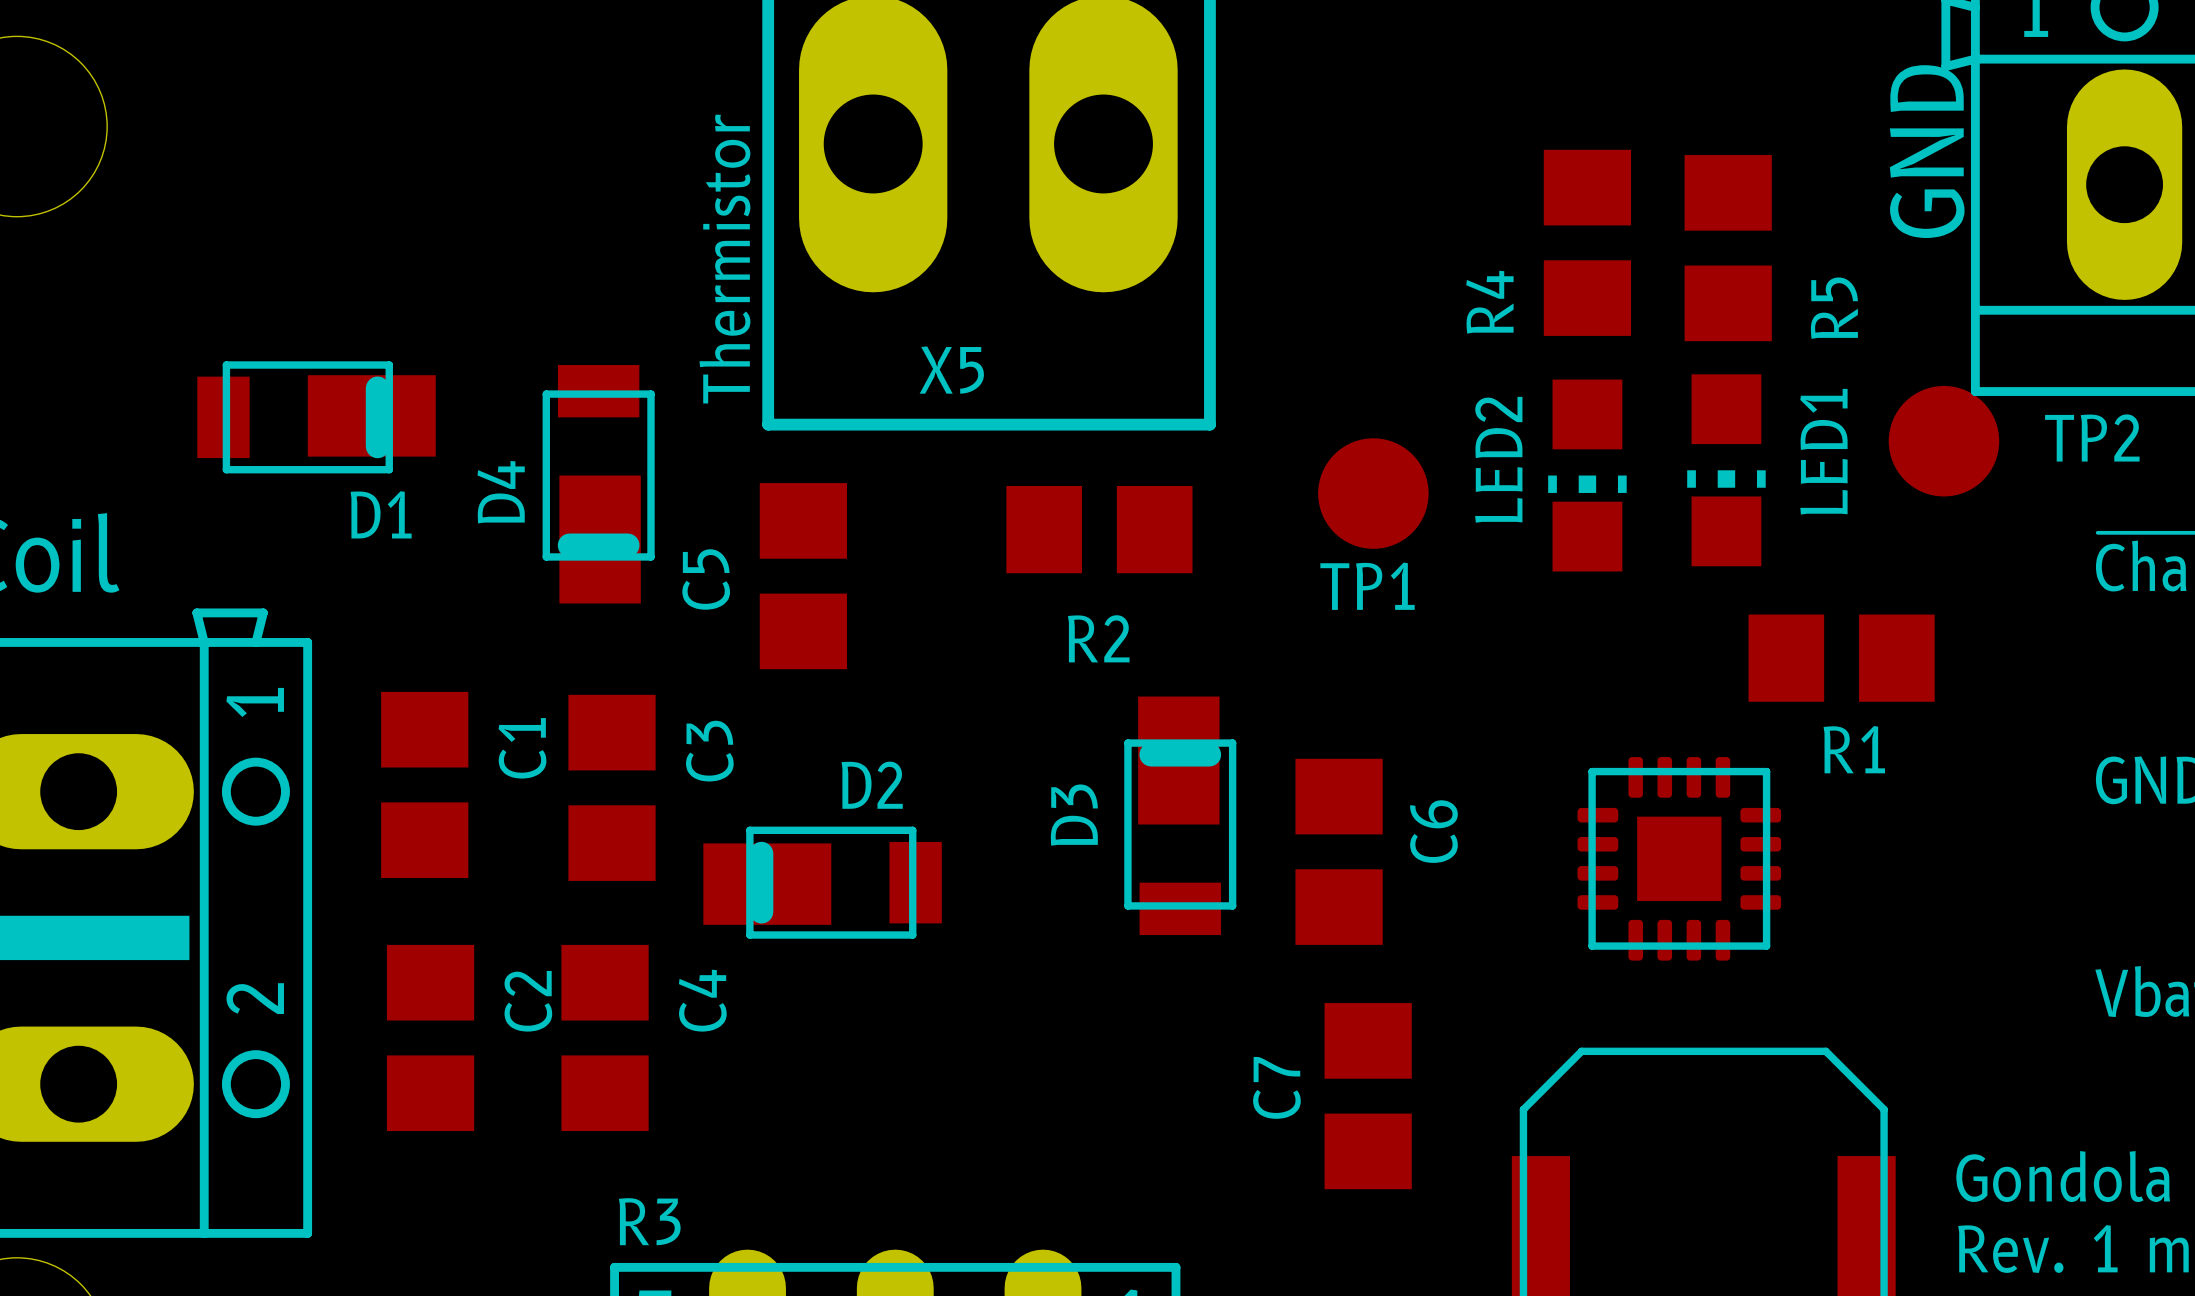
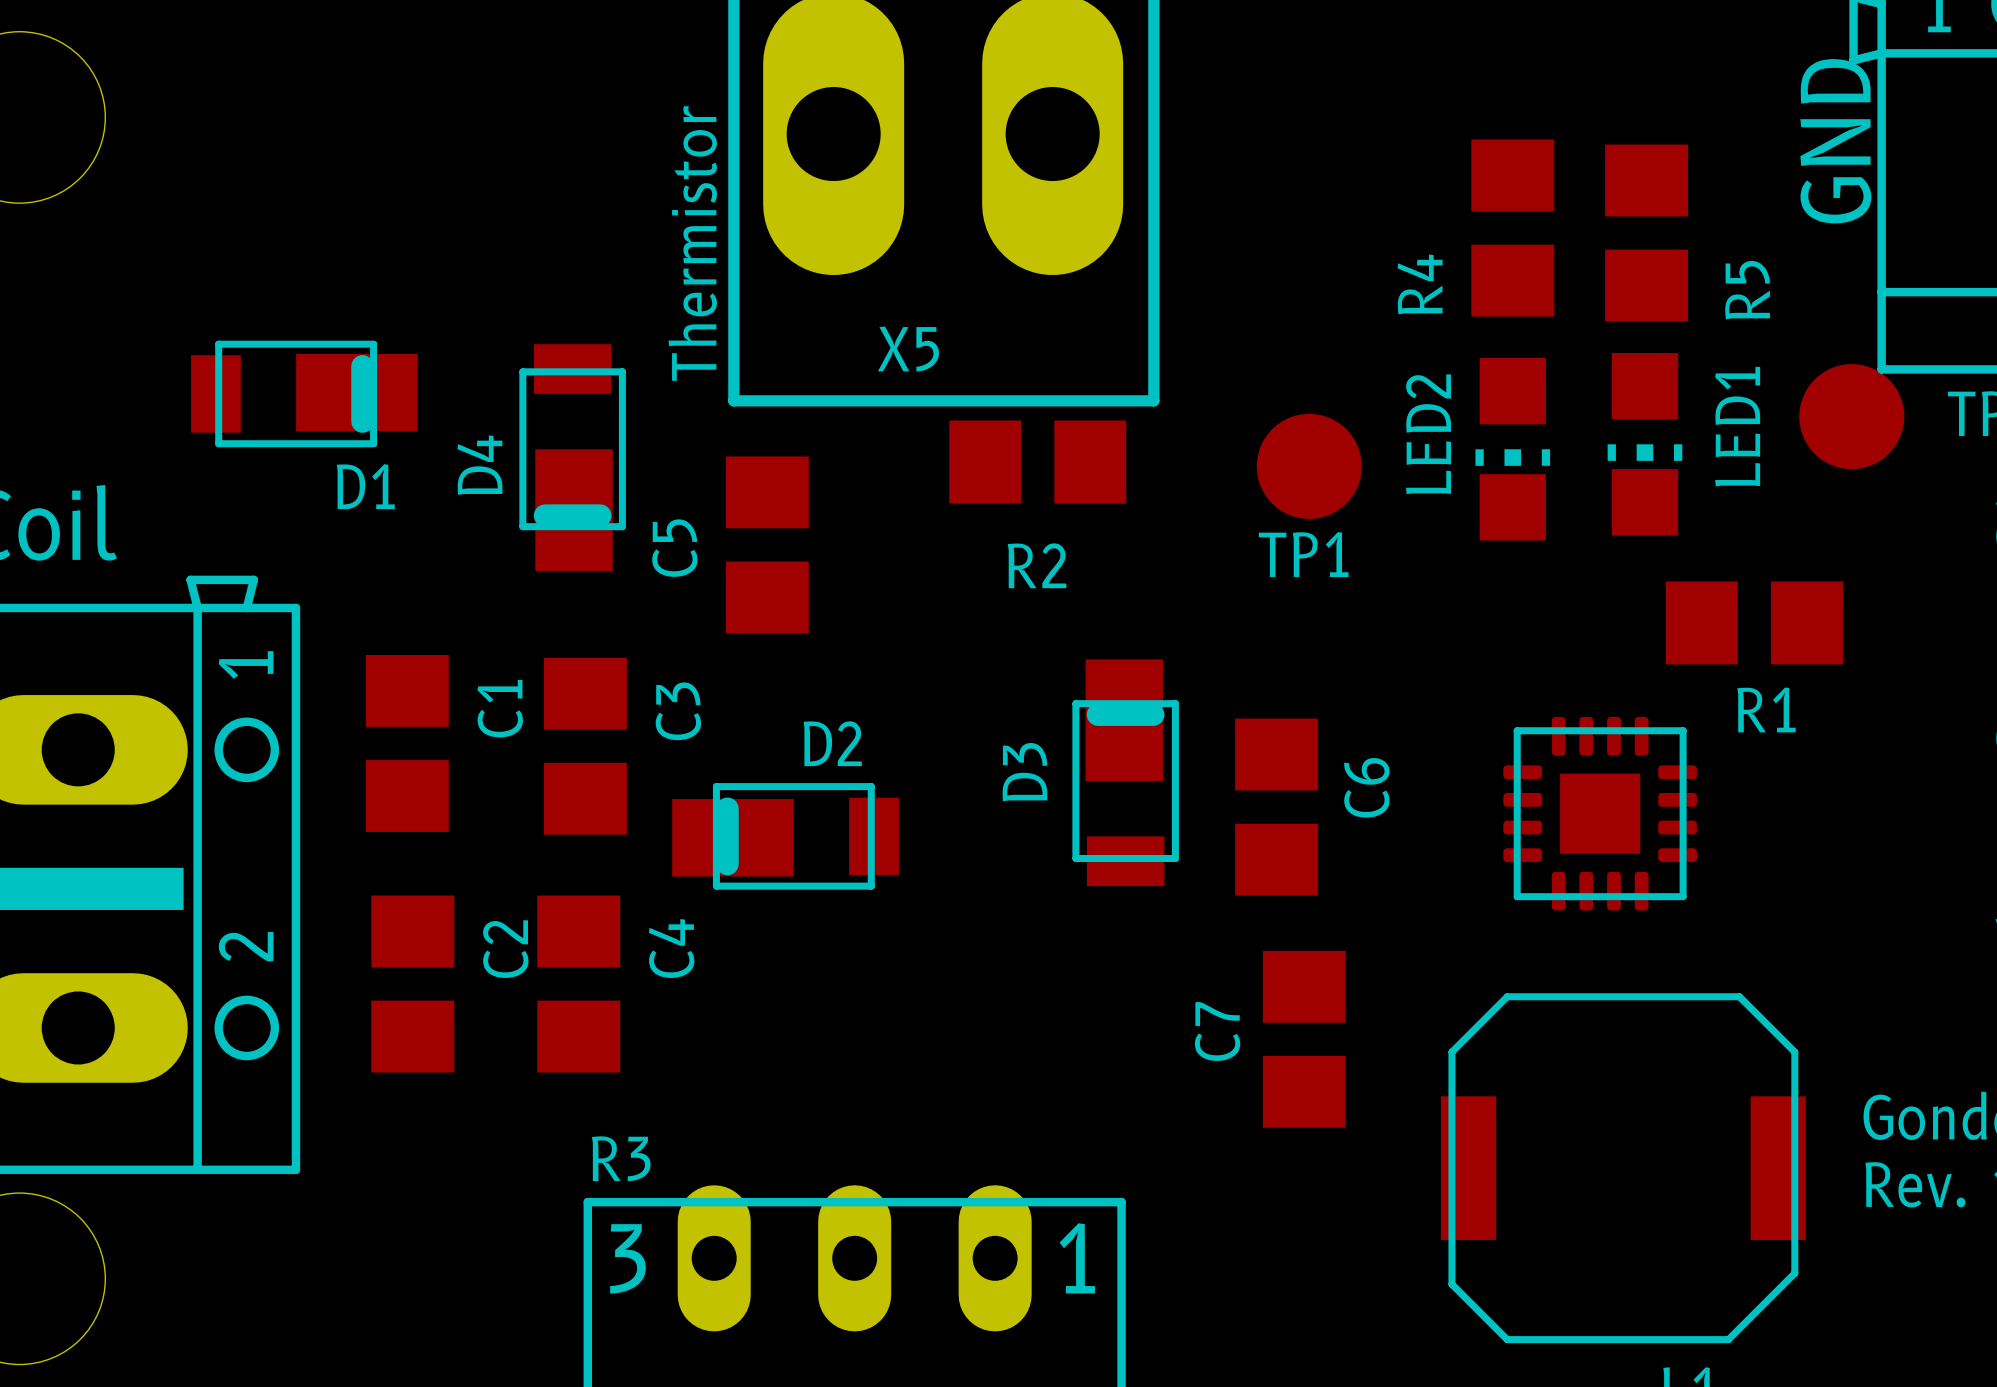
R2 position: (1099, 529) -> (1037, 461)

